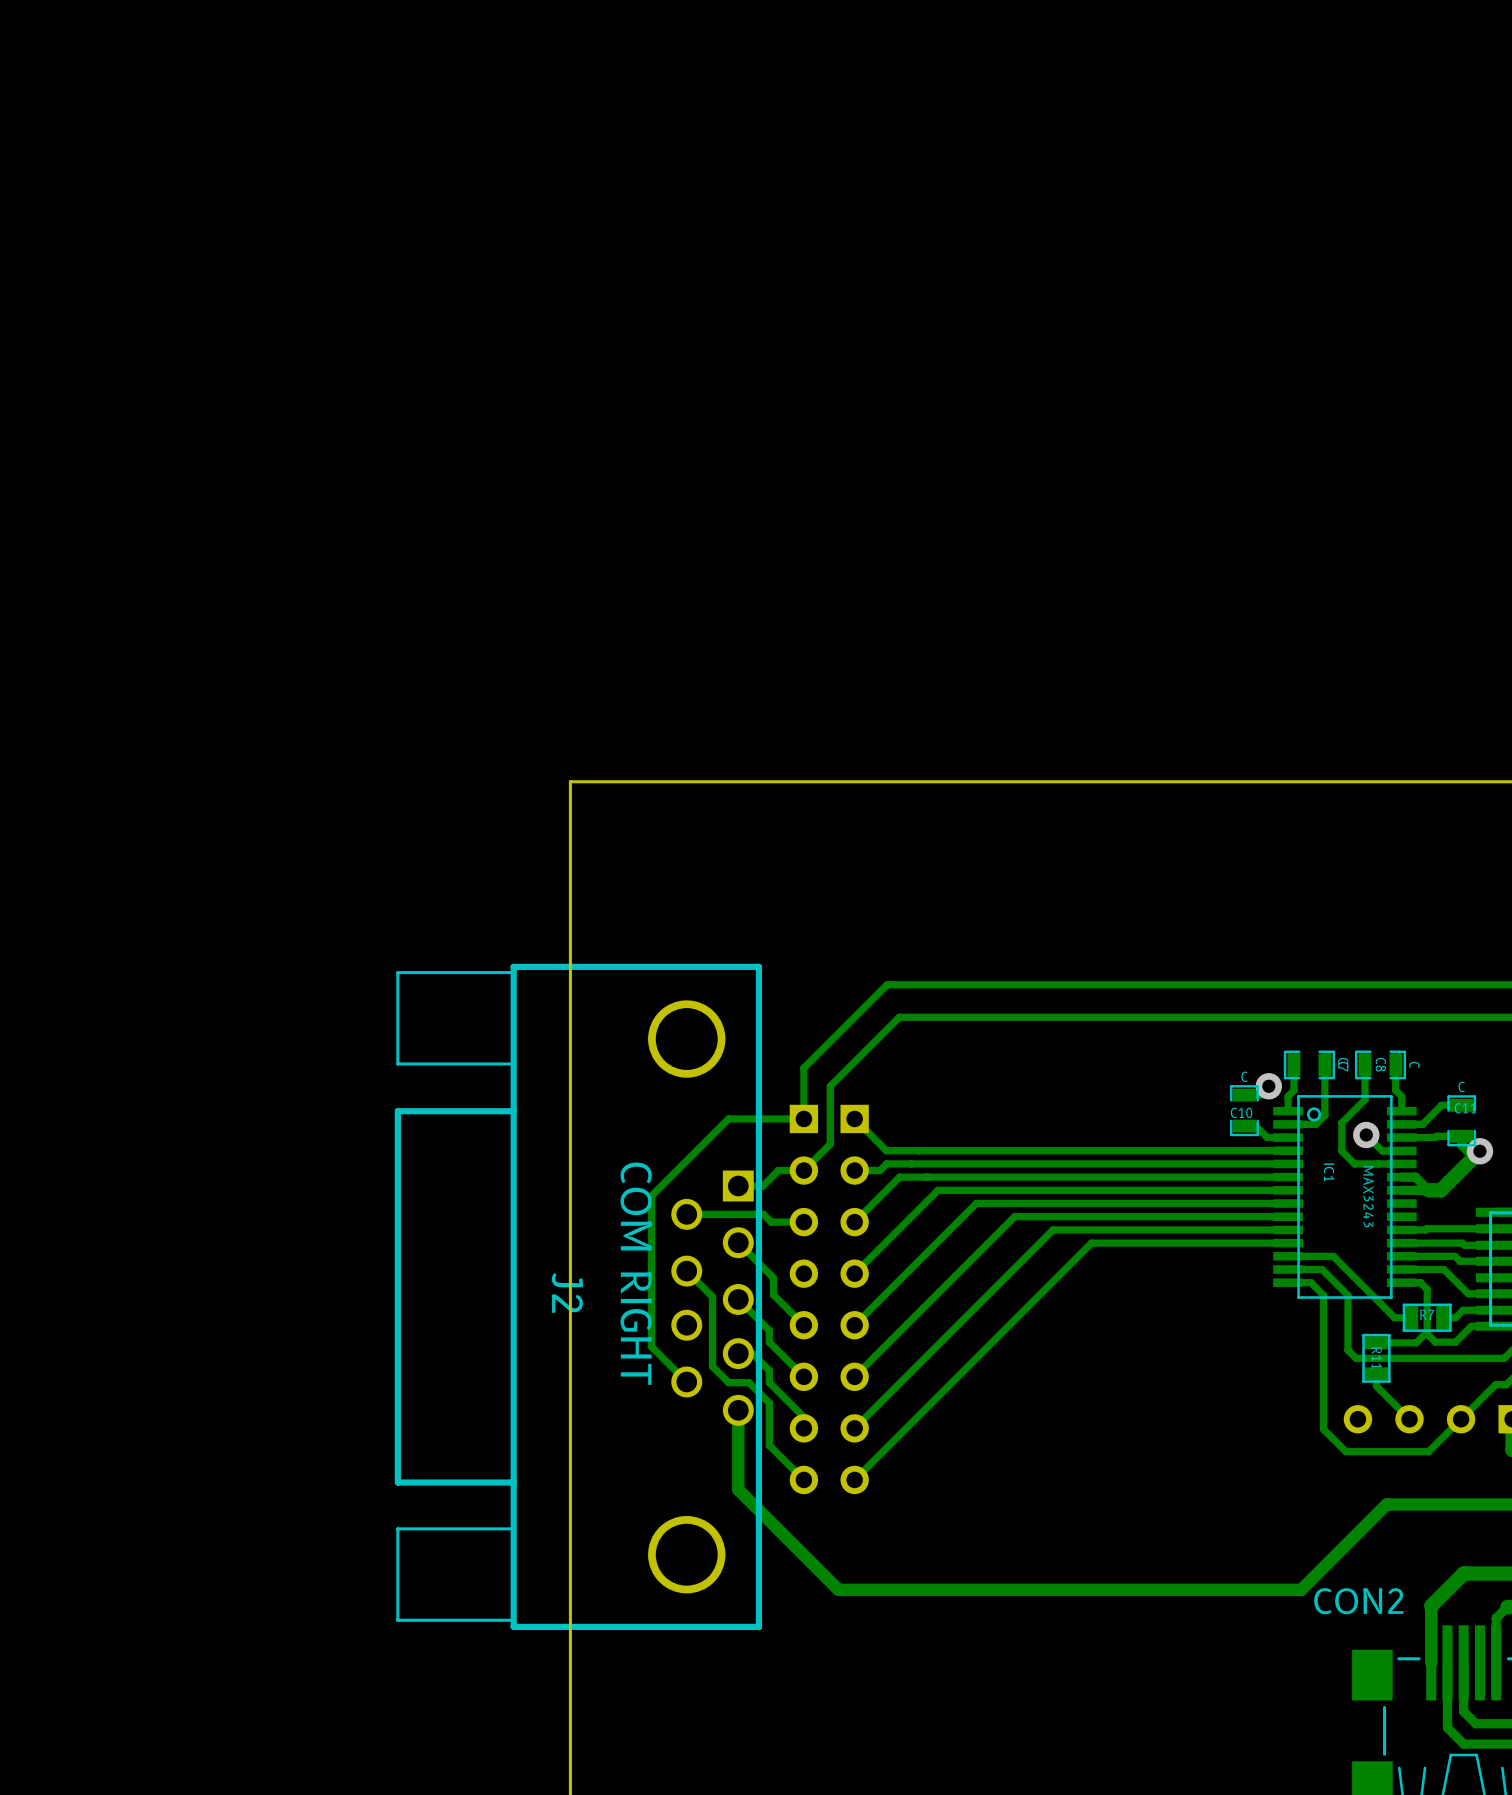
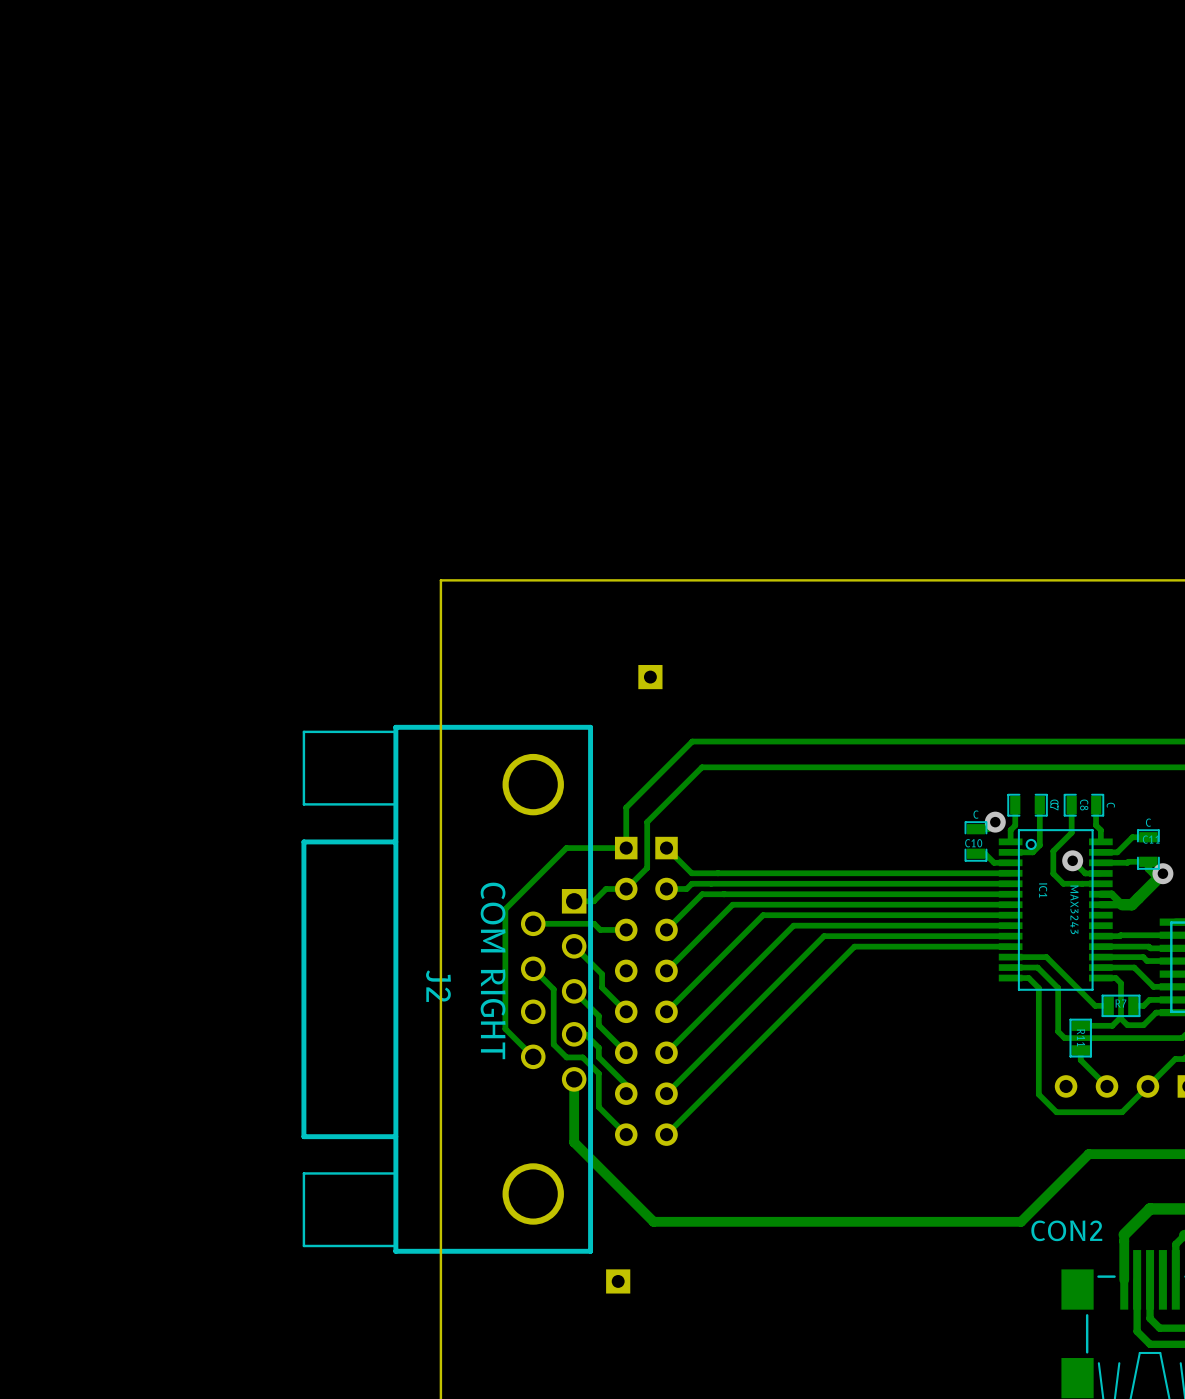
part: none -> (650, 677)
part: none -> (618, 1281)

